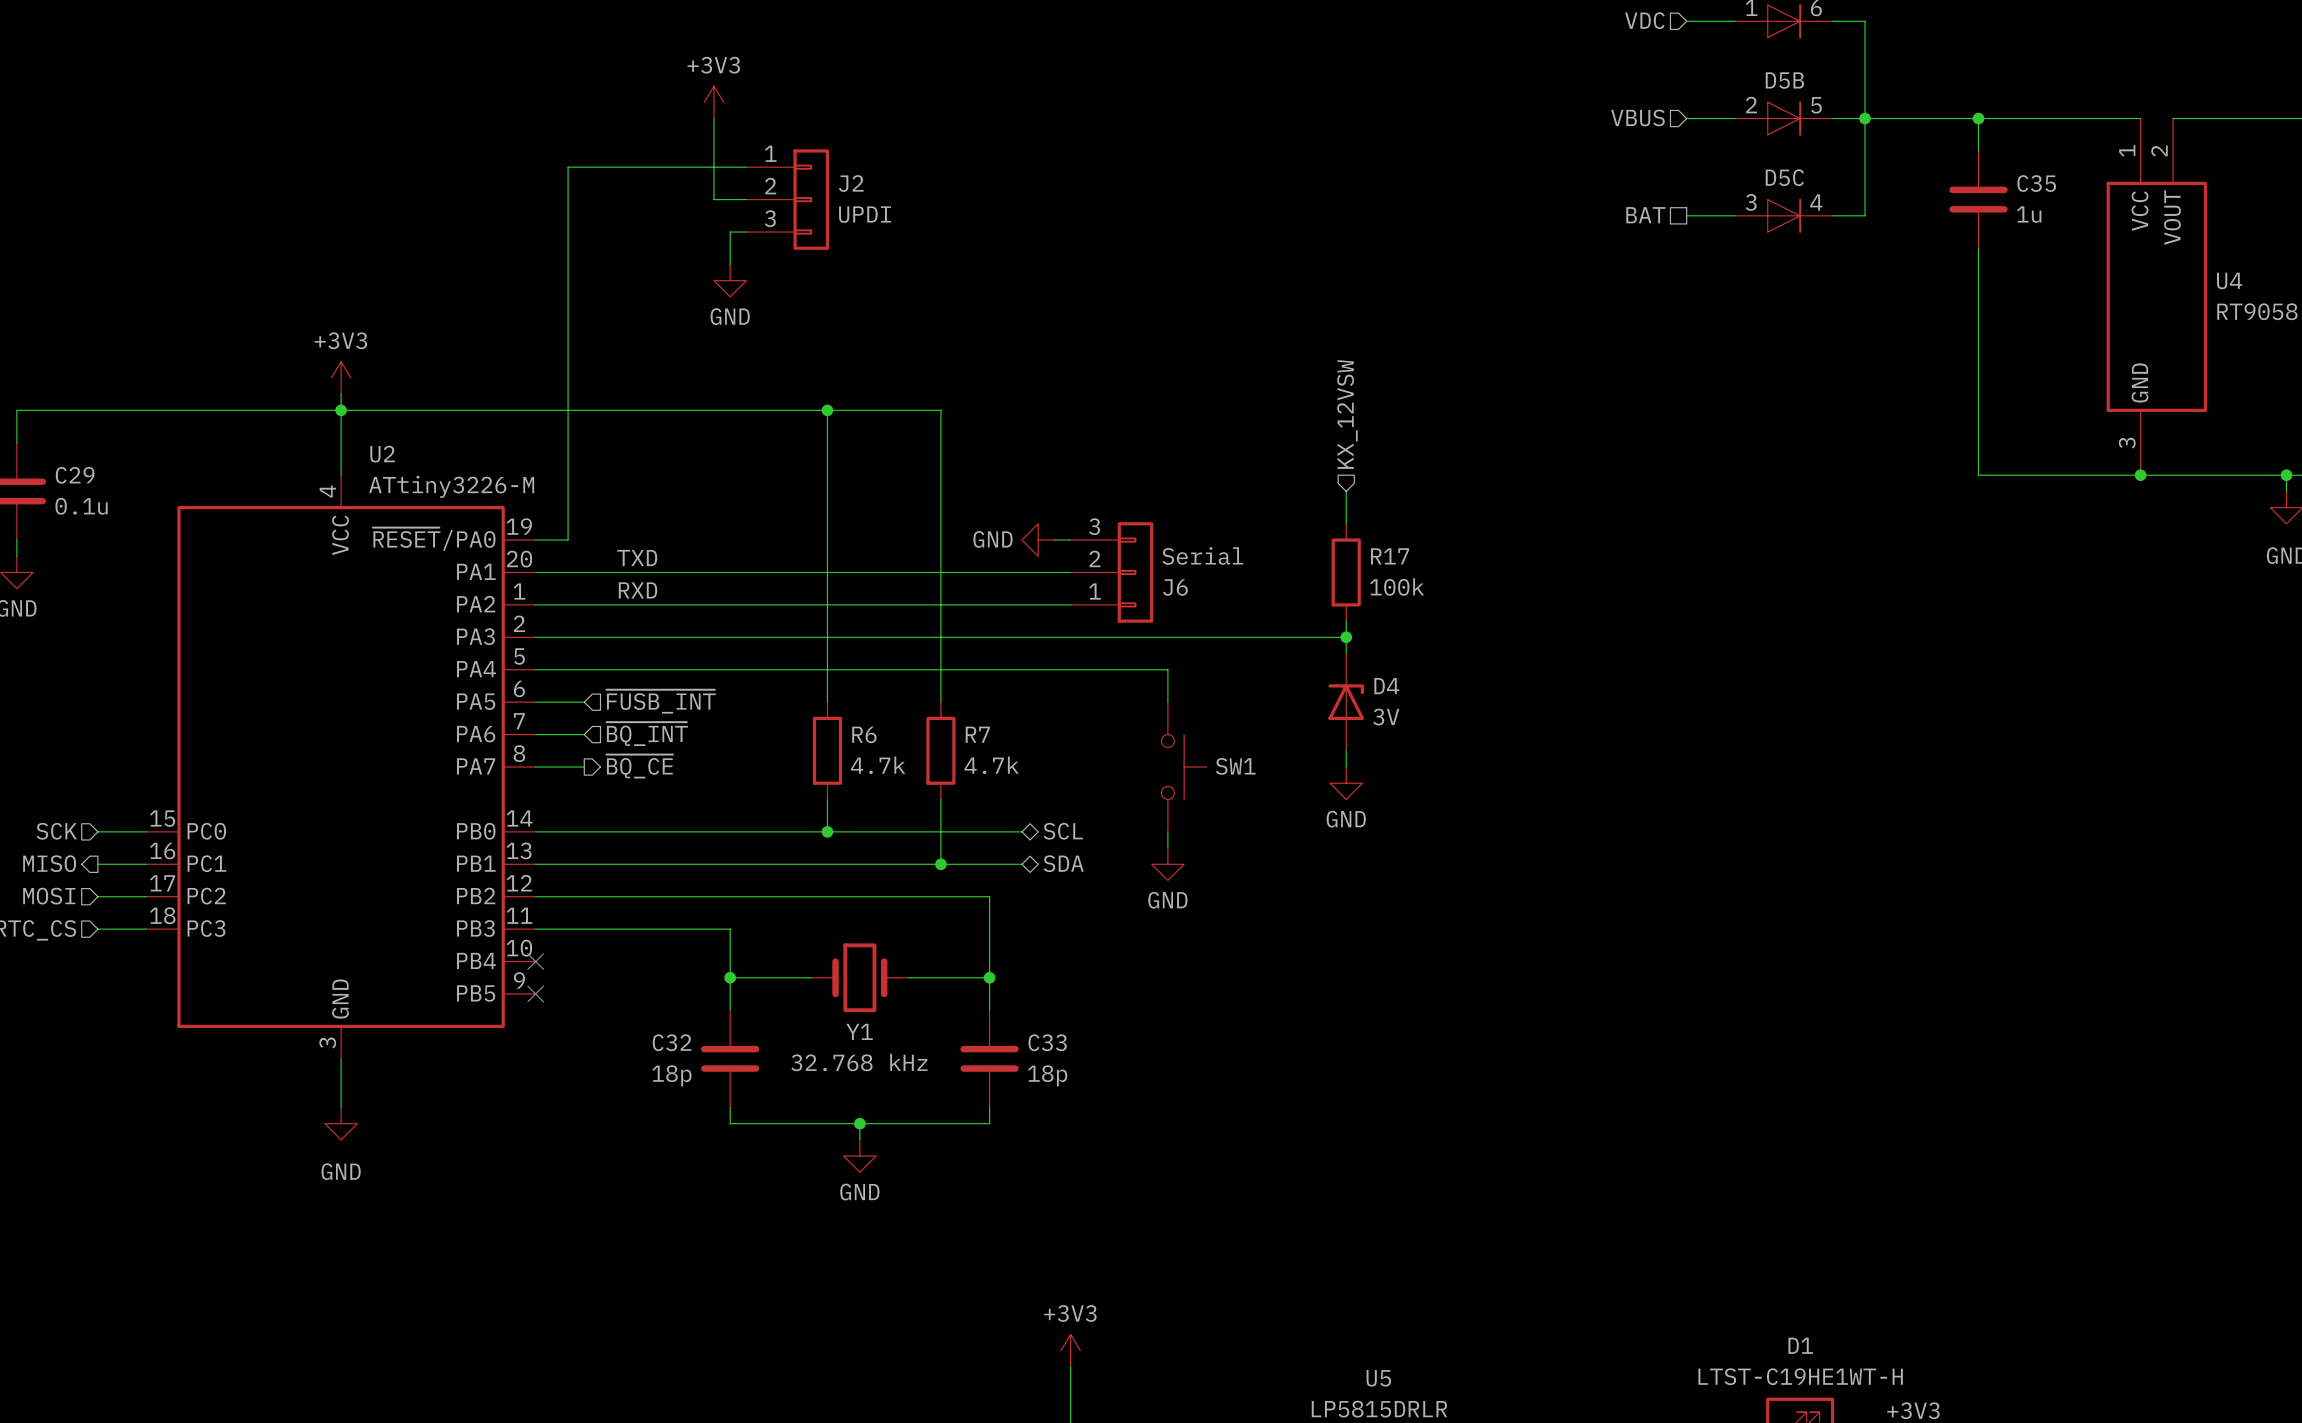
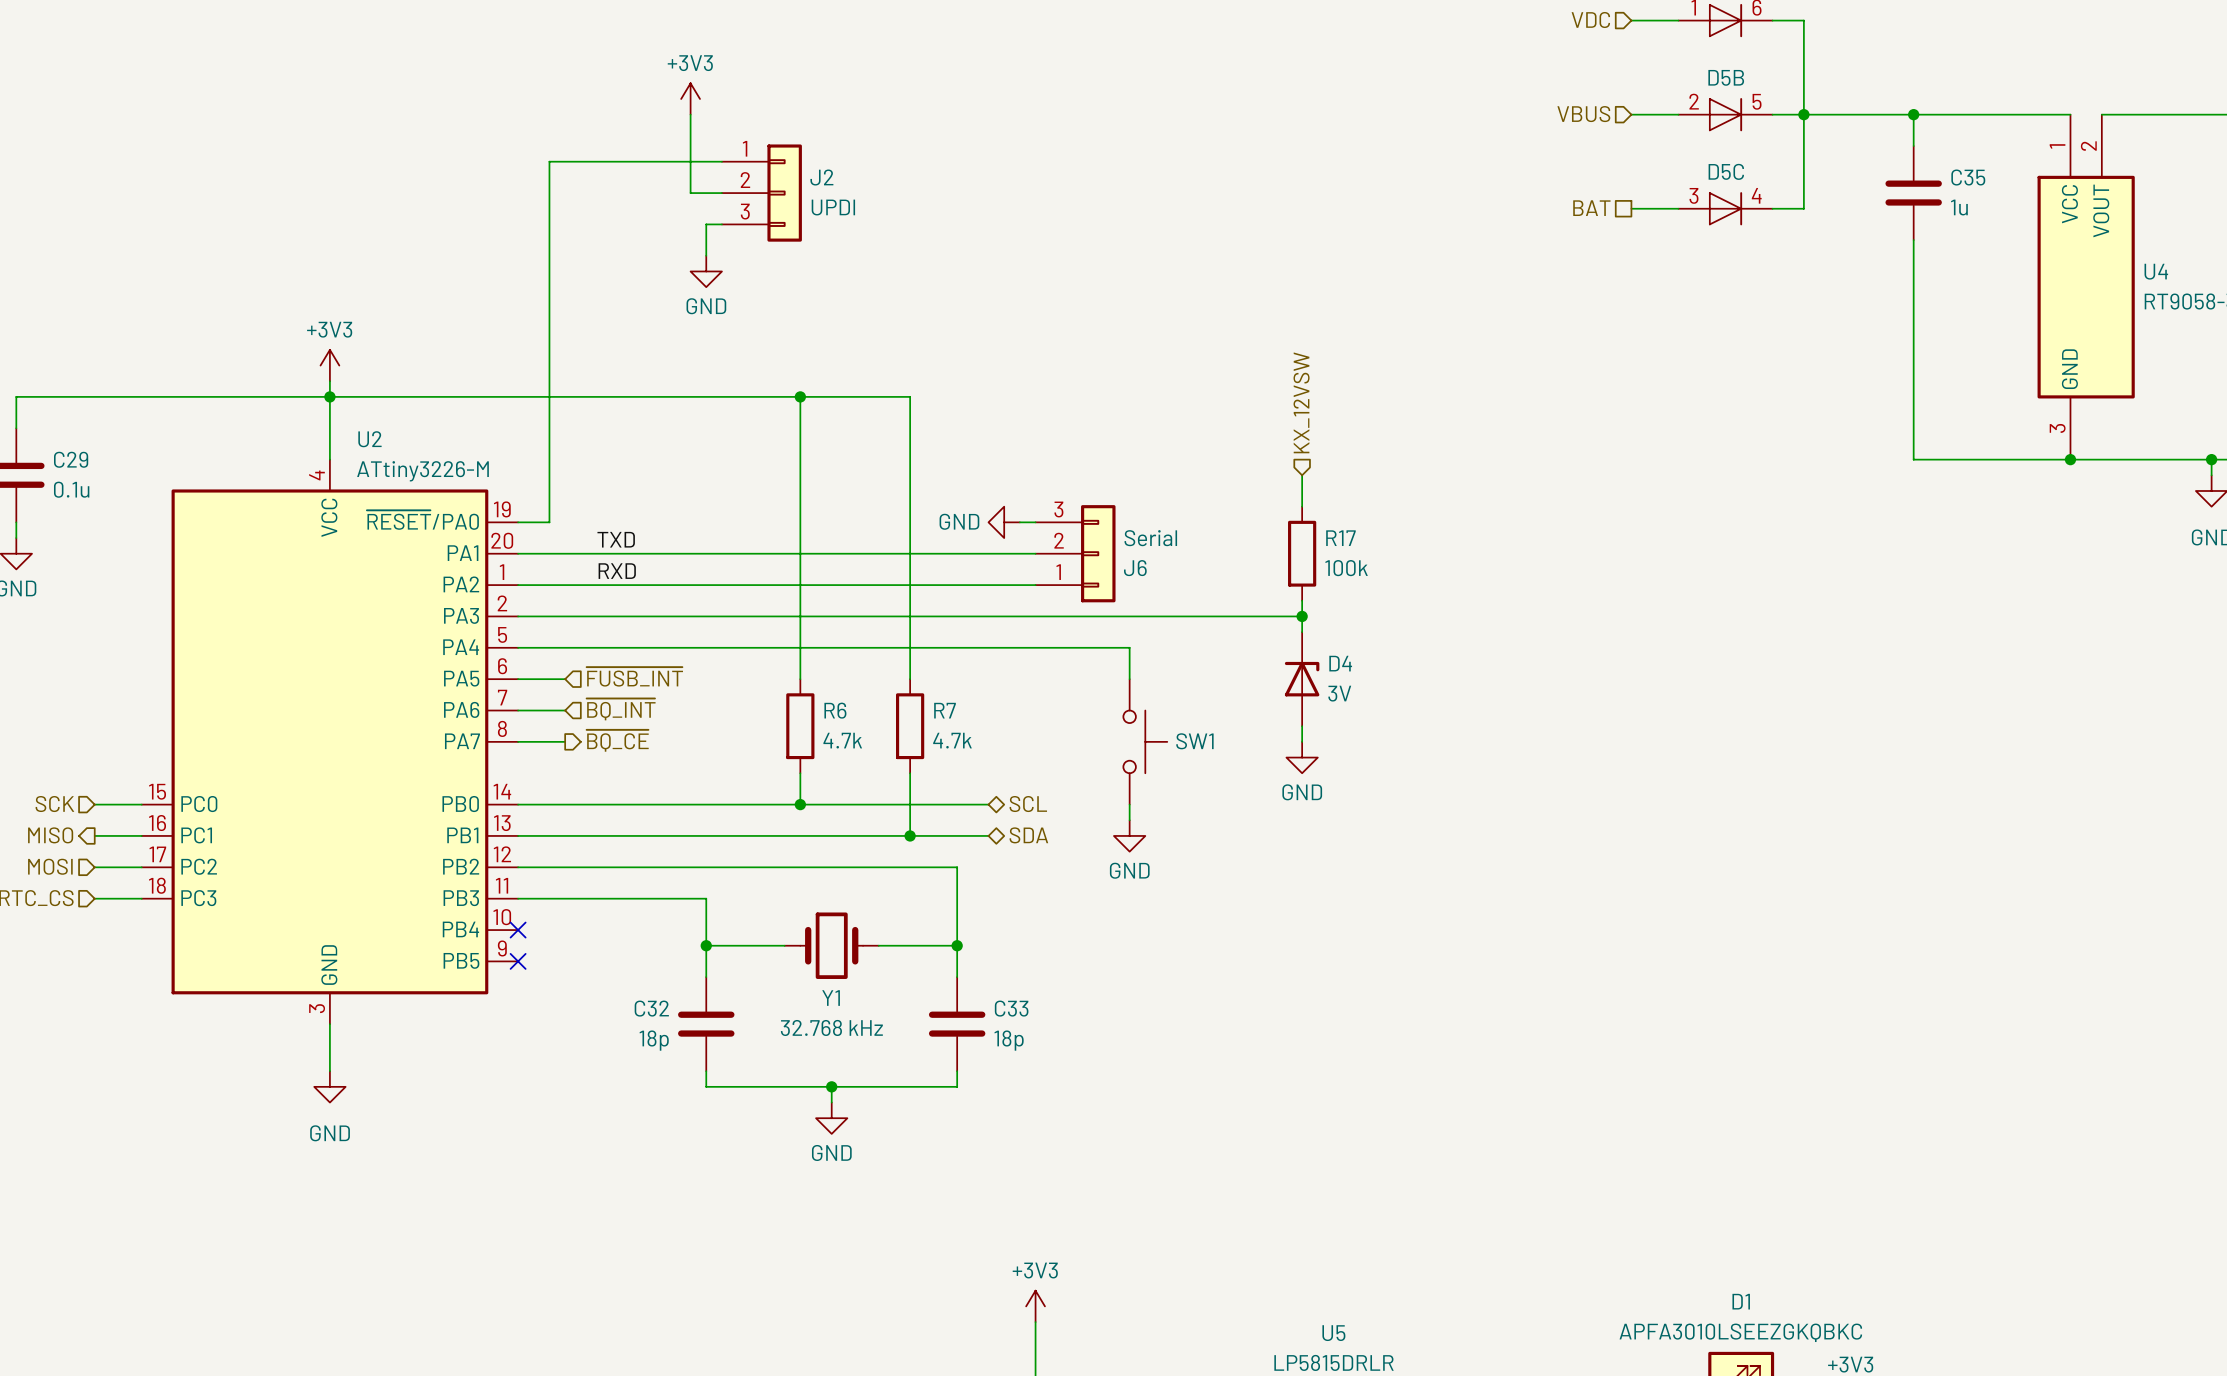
D1 value: LTST-C19HE1WT-H (1800, 1376) -> APFA3010LSEEZGKQBKC (1740, 1332)

